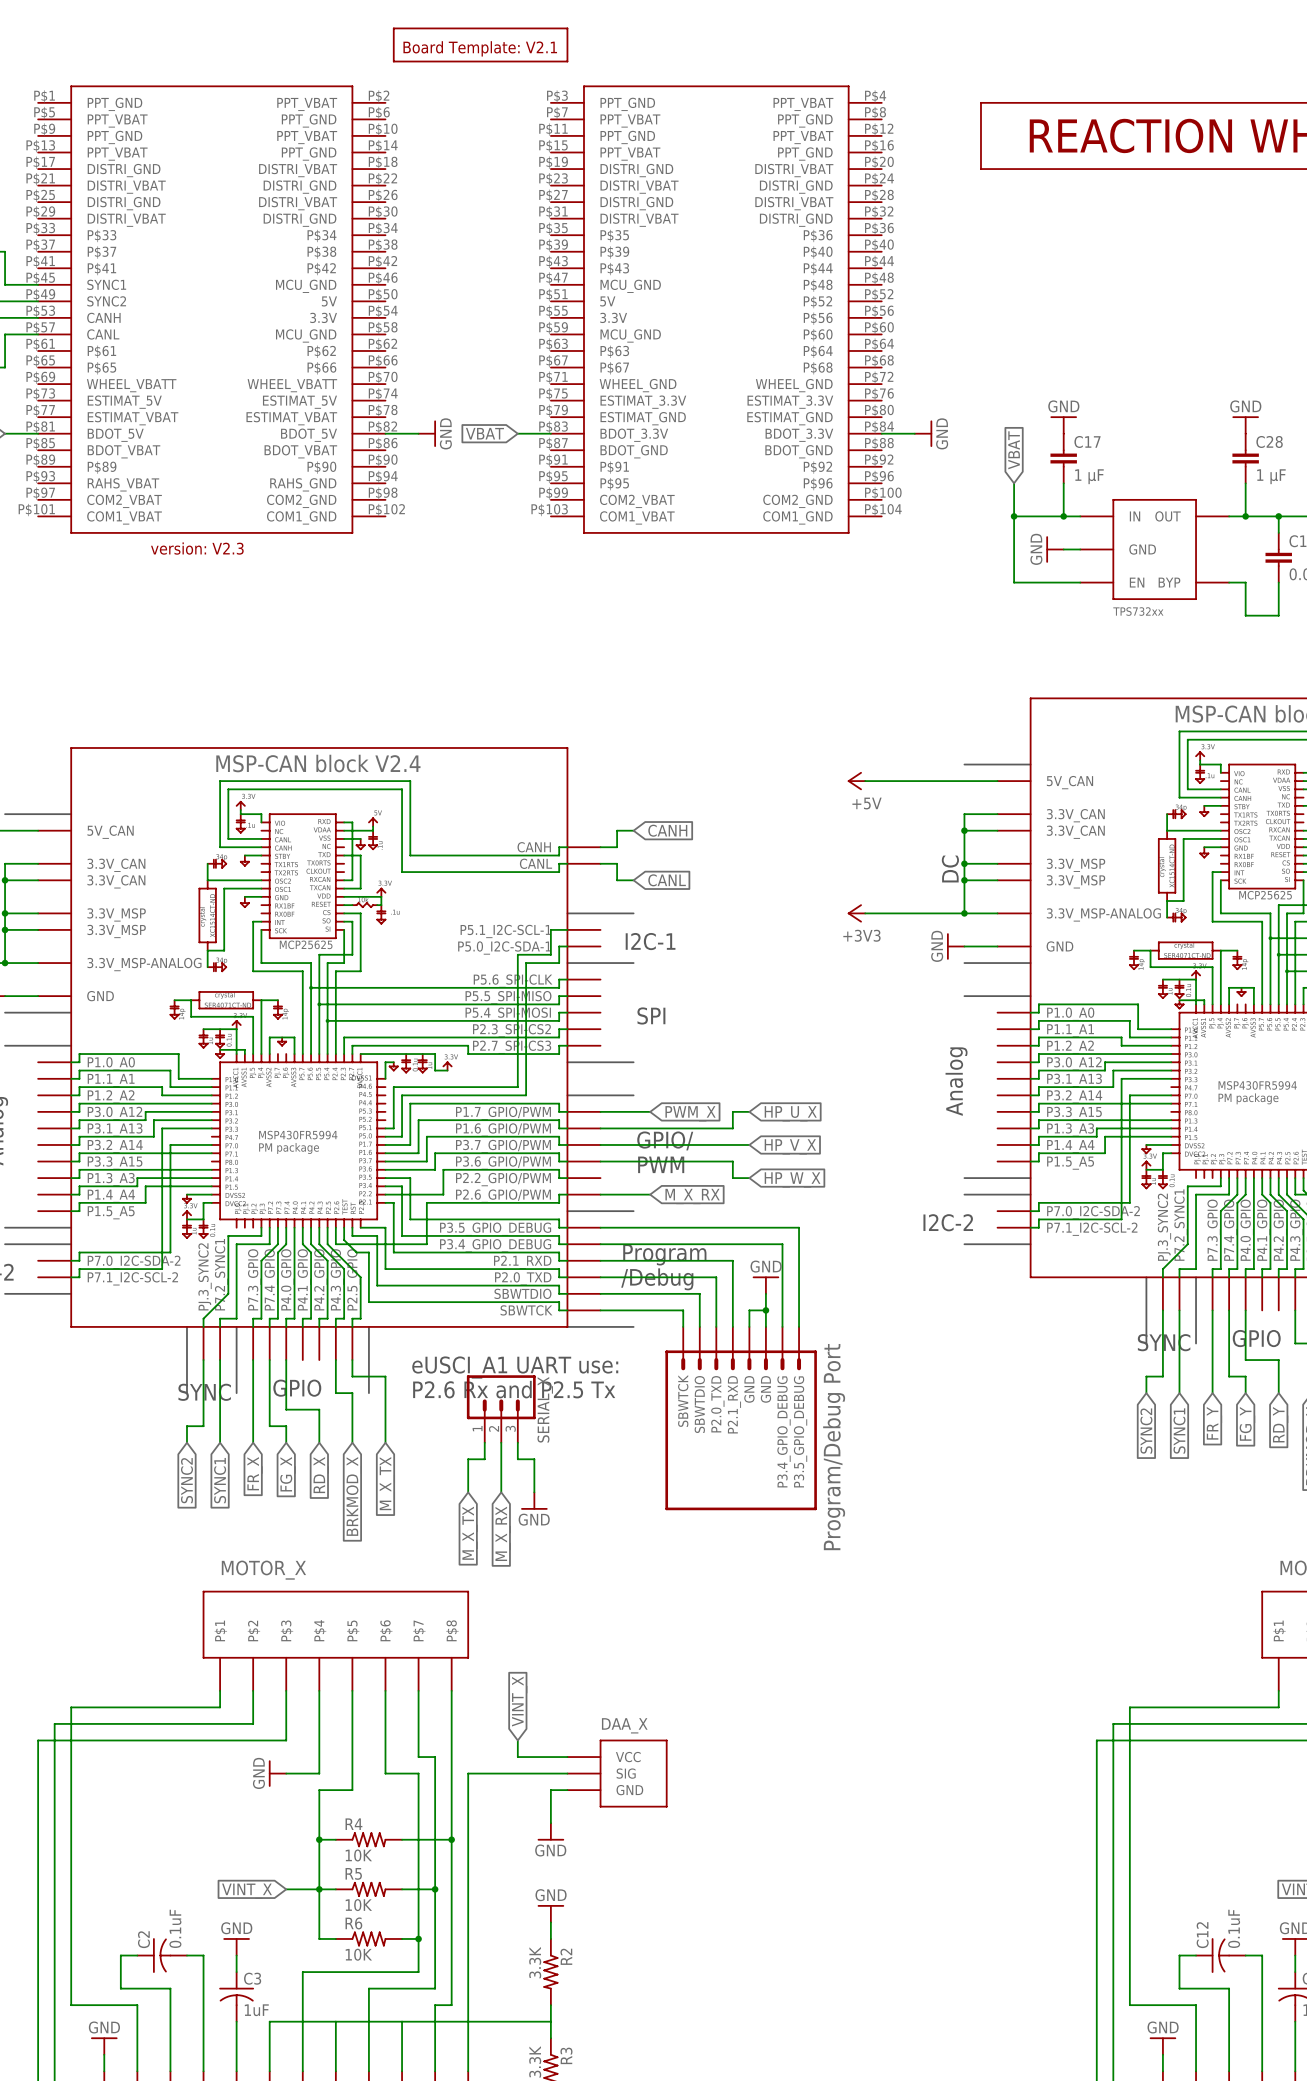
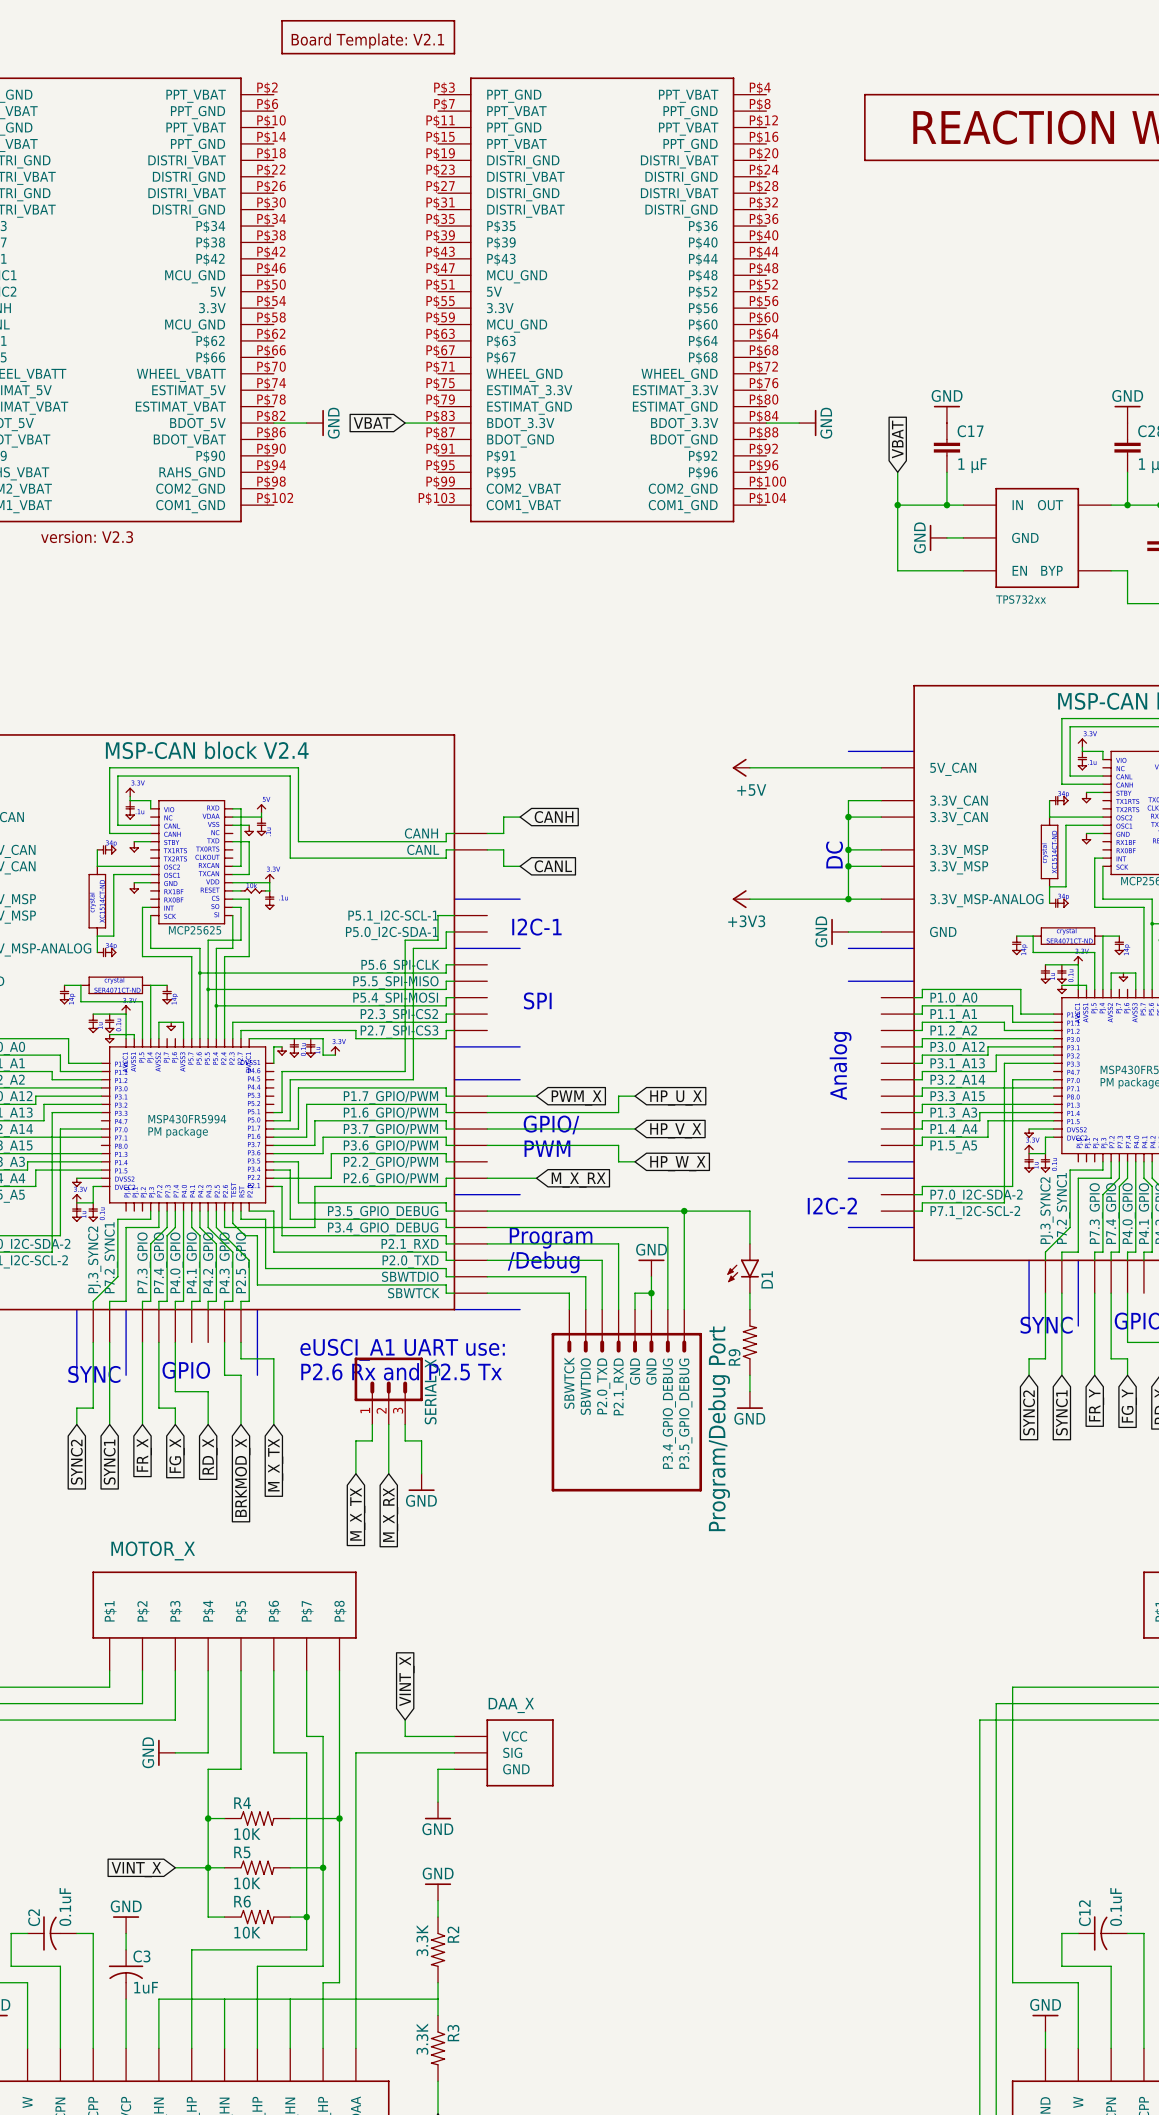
wire: none -> (684, 1211) (749, 1211) (749, 1243)
junction: none -> (684, 1211)
D1: none -> (743, 1268)
wire: none -> (749, 1293) (749, 1309)
R9: none -> (749, 1342)
wire: none -> (749, 1375) (749, 1391)
power symbol: none -> GND (749, 1400)

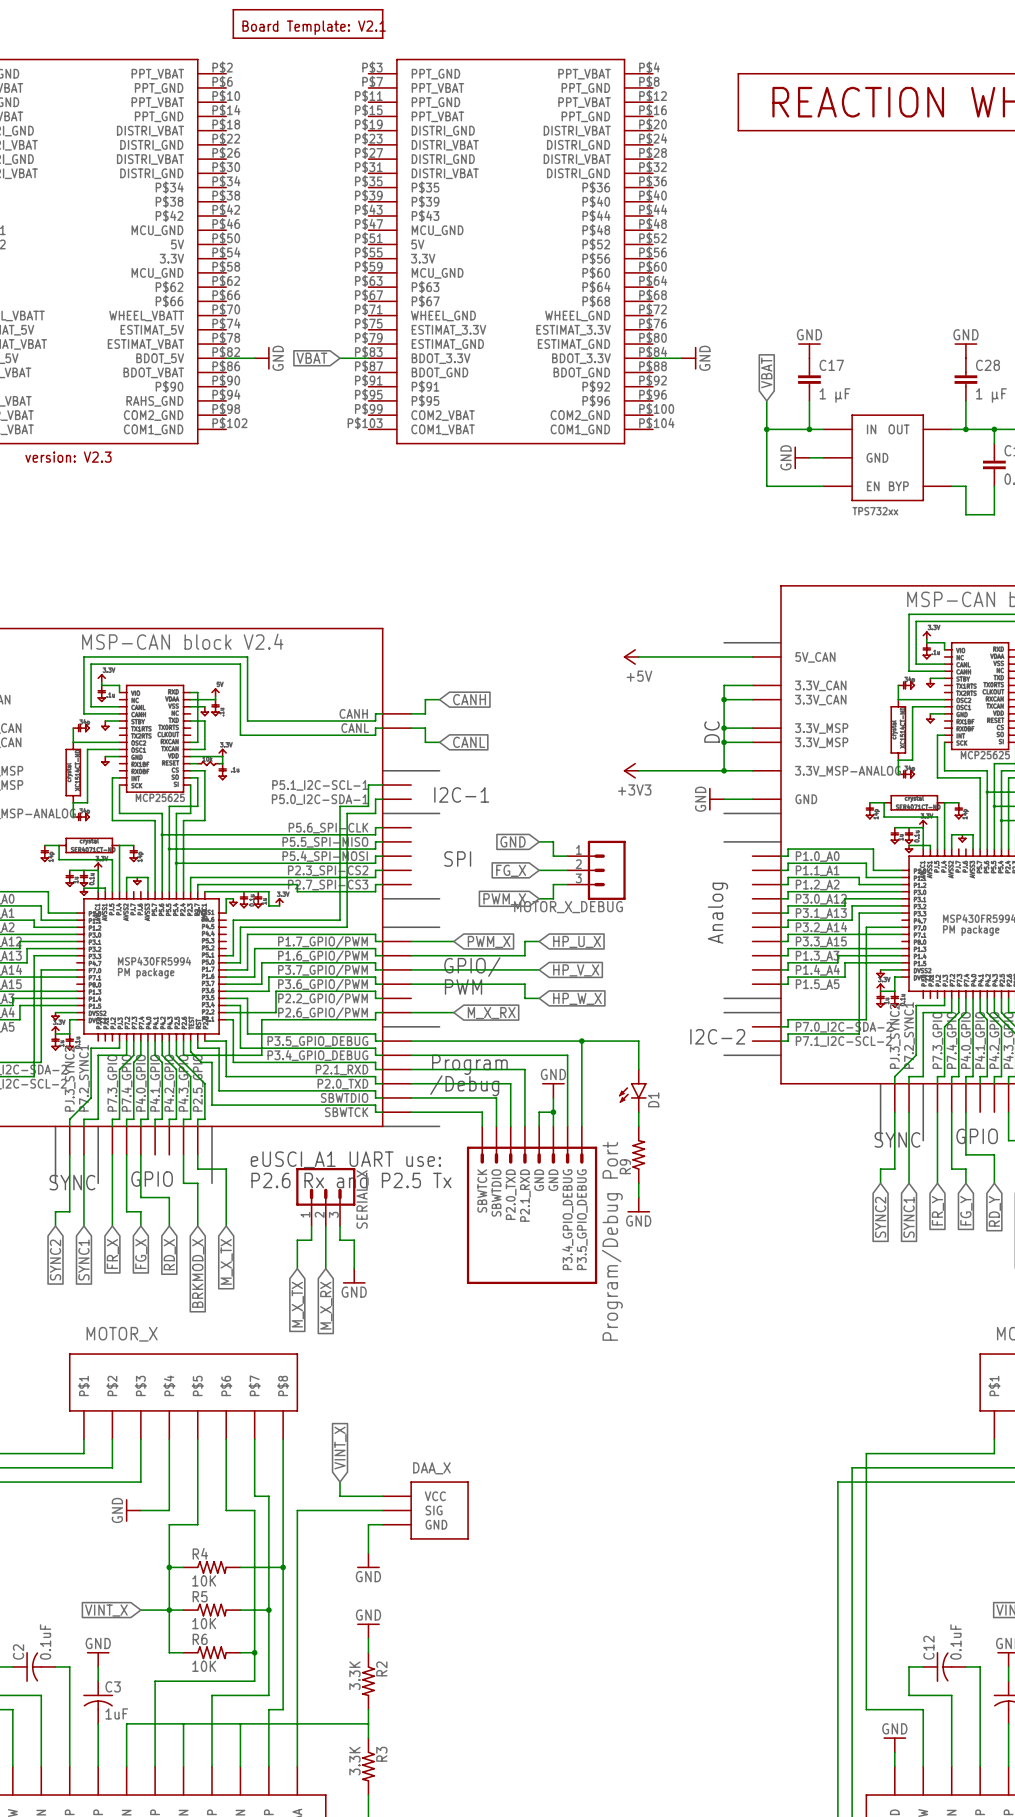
global label: none -> GND (513, 841)
wire: none -> (539, 841) (553, 841) (553, 856) (567, 856)
wire: none -> (539, 870) (567, 870)
MOTOR_X_DEBUG: none -> (596, 870)
global label: none -> FG_X (511, 870)
wire: none -> (567, 884) (553, 884) (553, 898) (539, 898)
global label: none -> PWM_X (504, 899)

